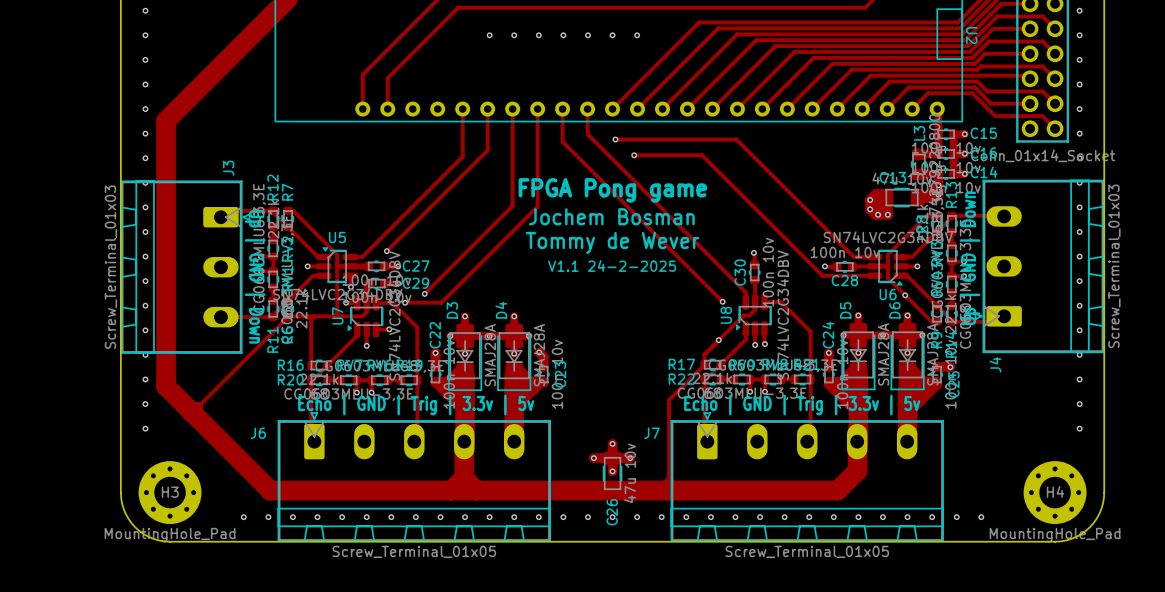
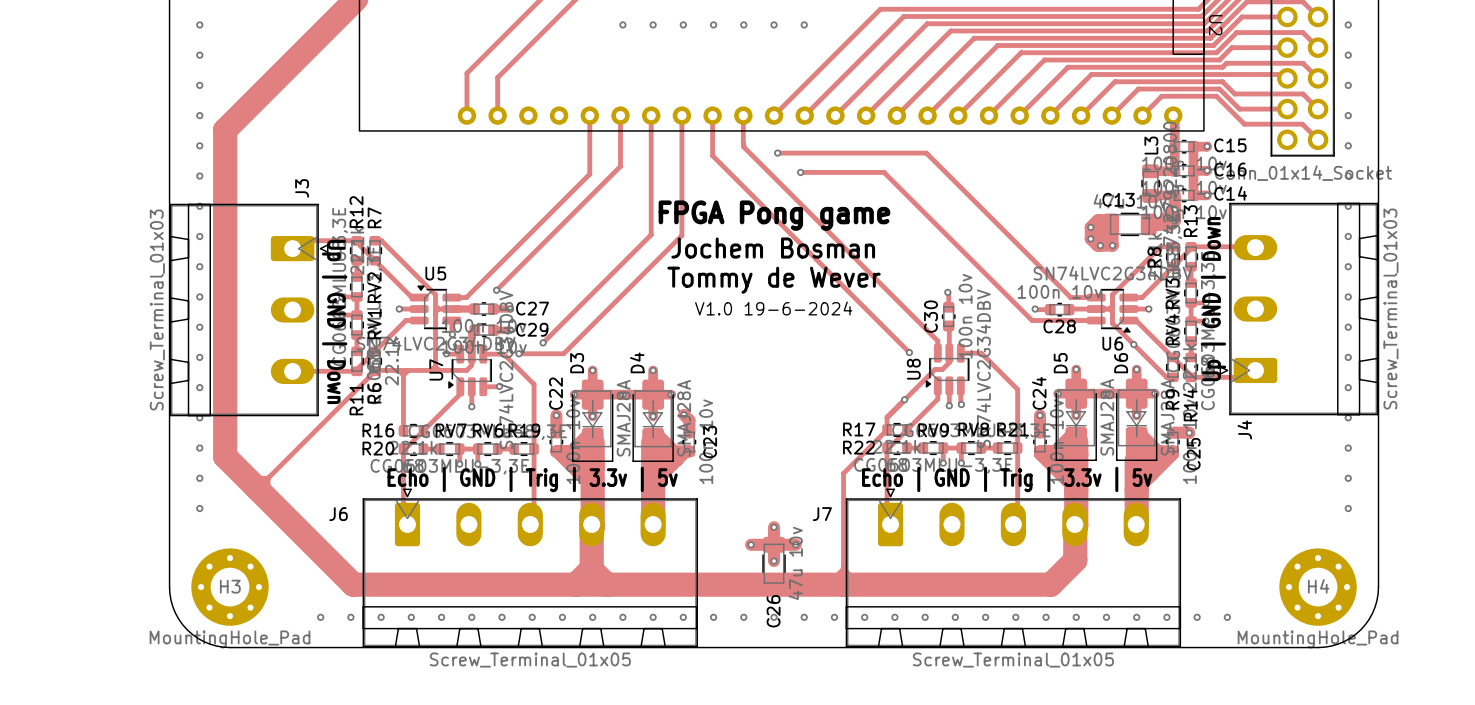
text: V1.1 24-2-2025 (612, 265) -> V1.0 19-6-2024 (773, 308)

